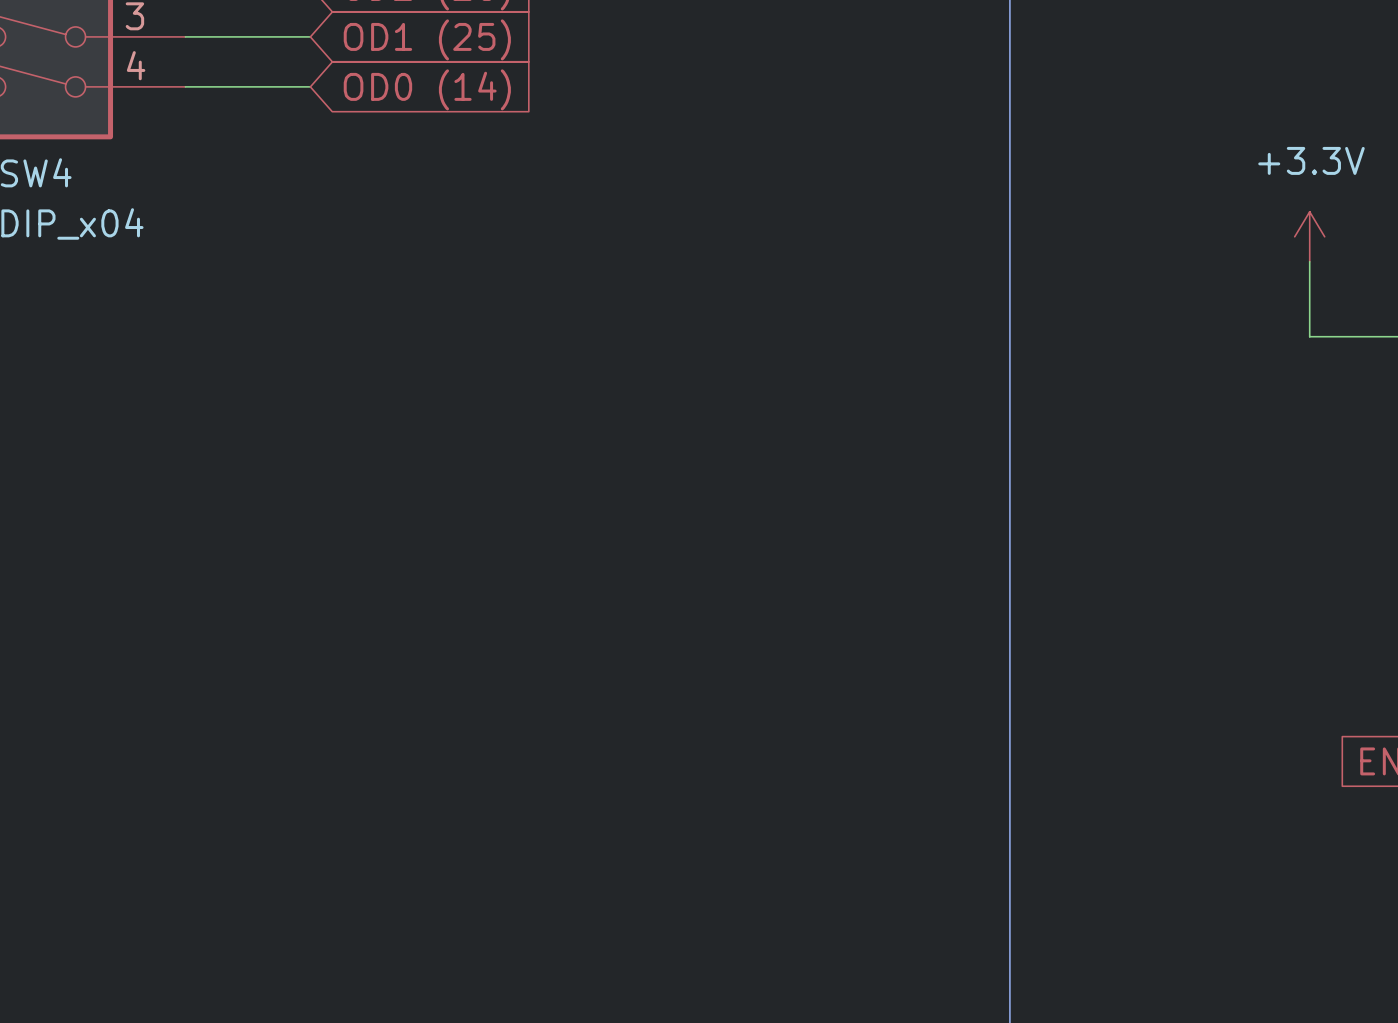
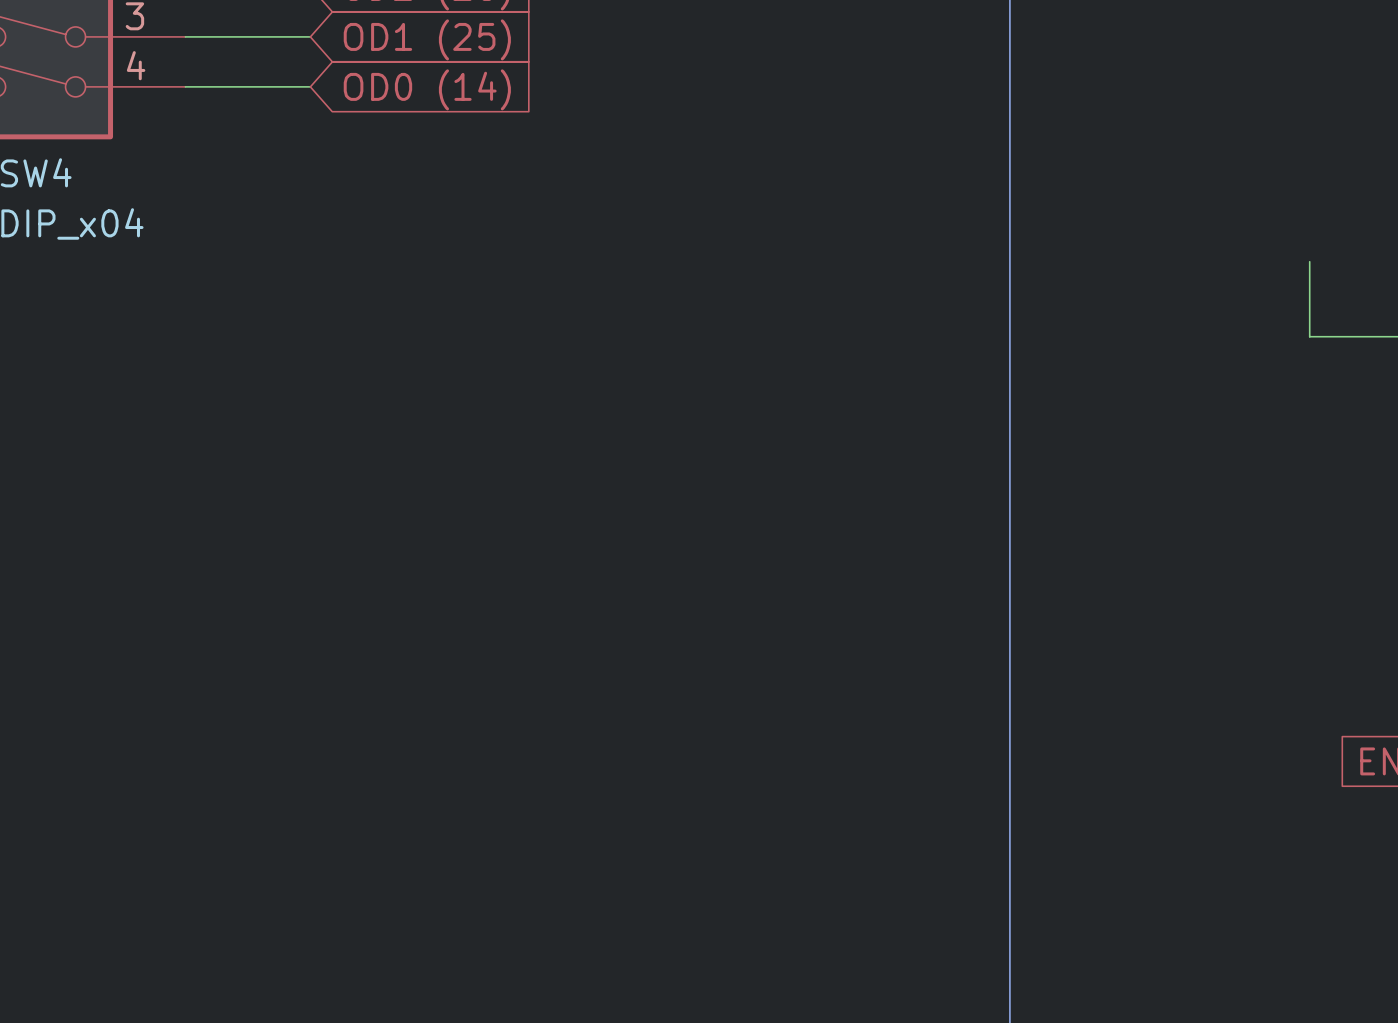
power symbol: +3.3V (1309, 236) -> none

